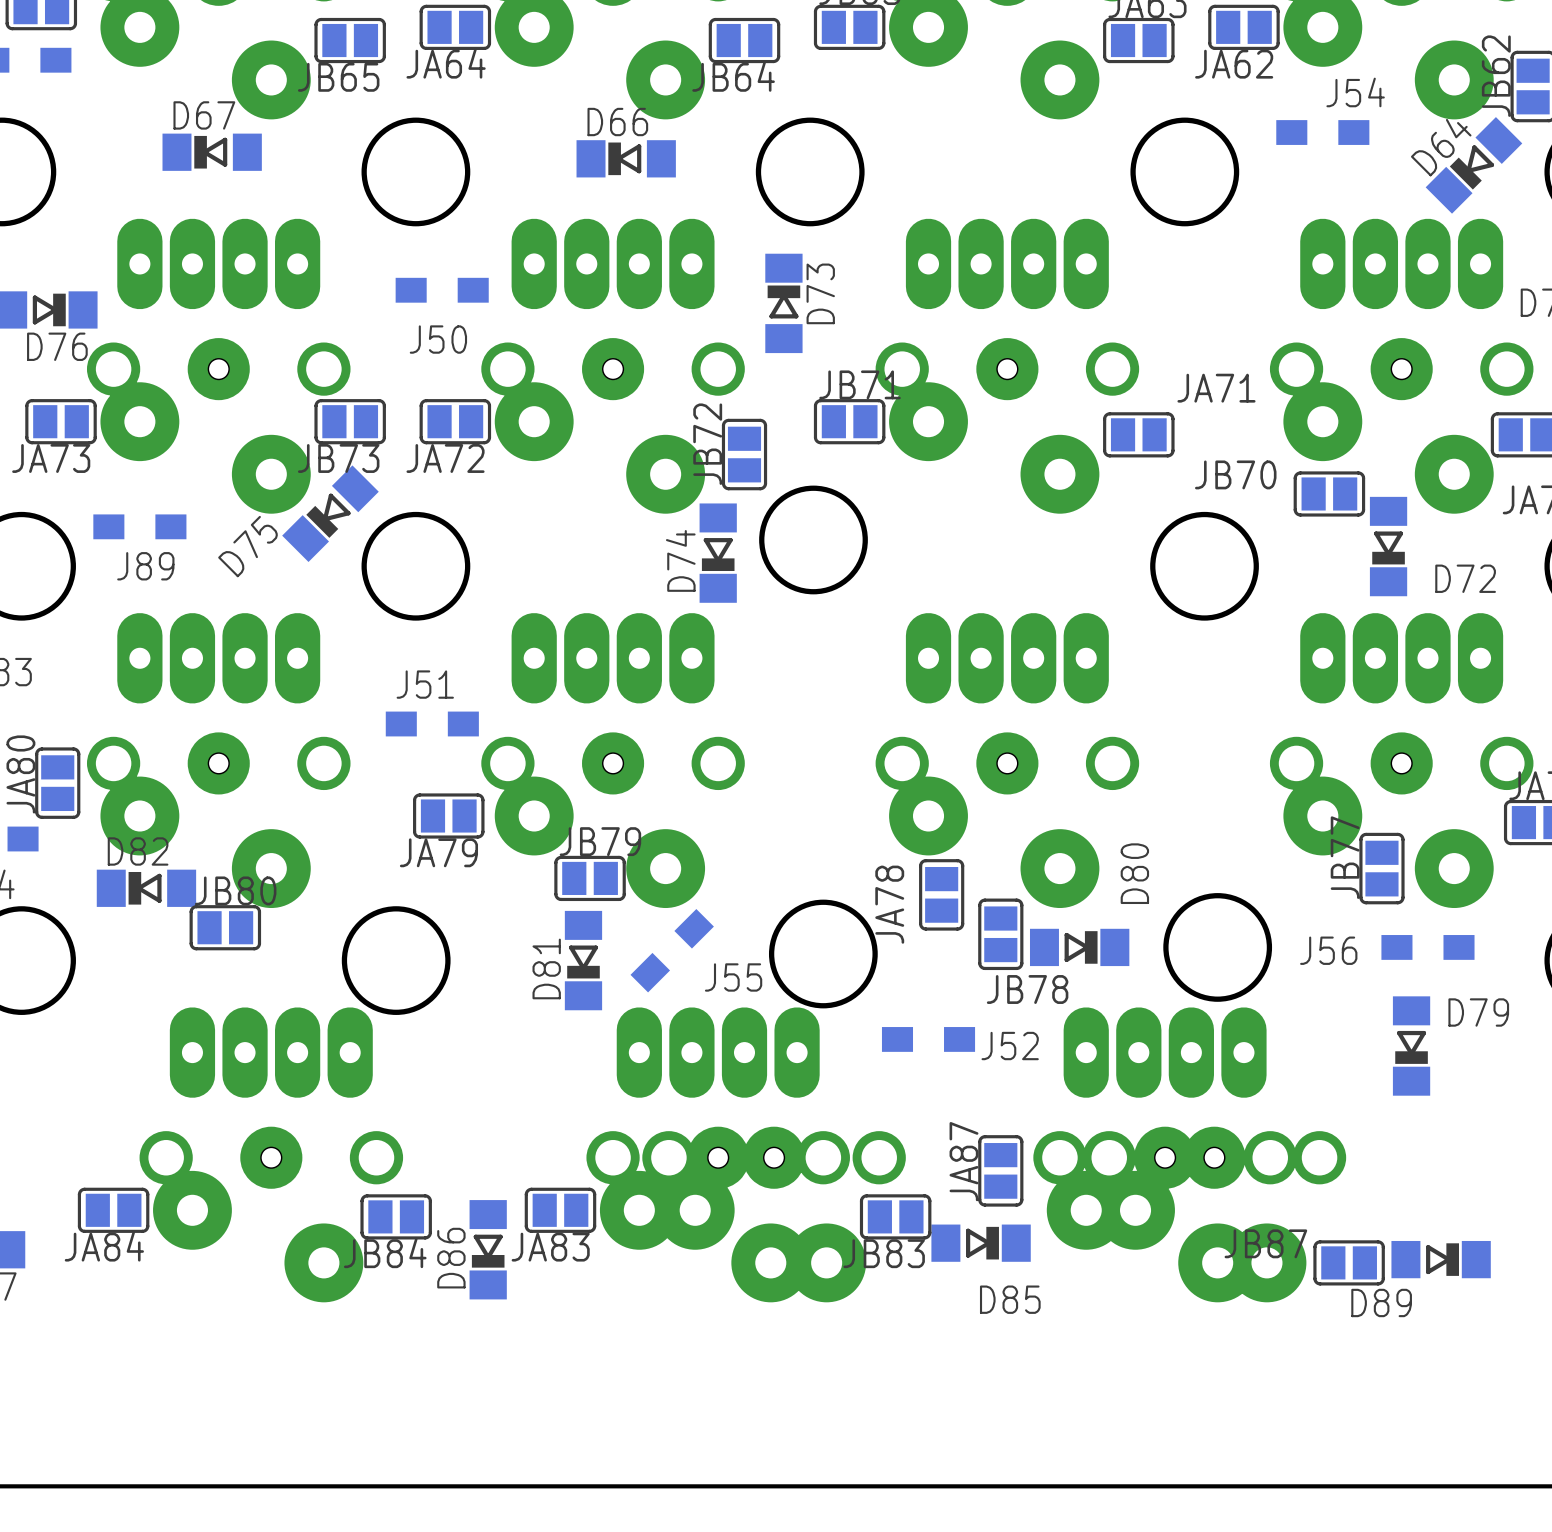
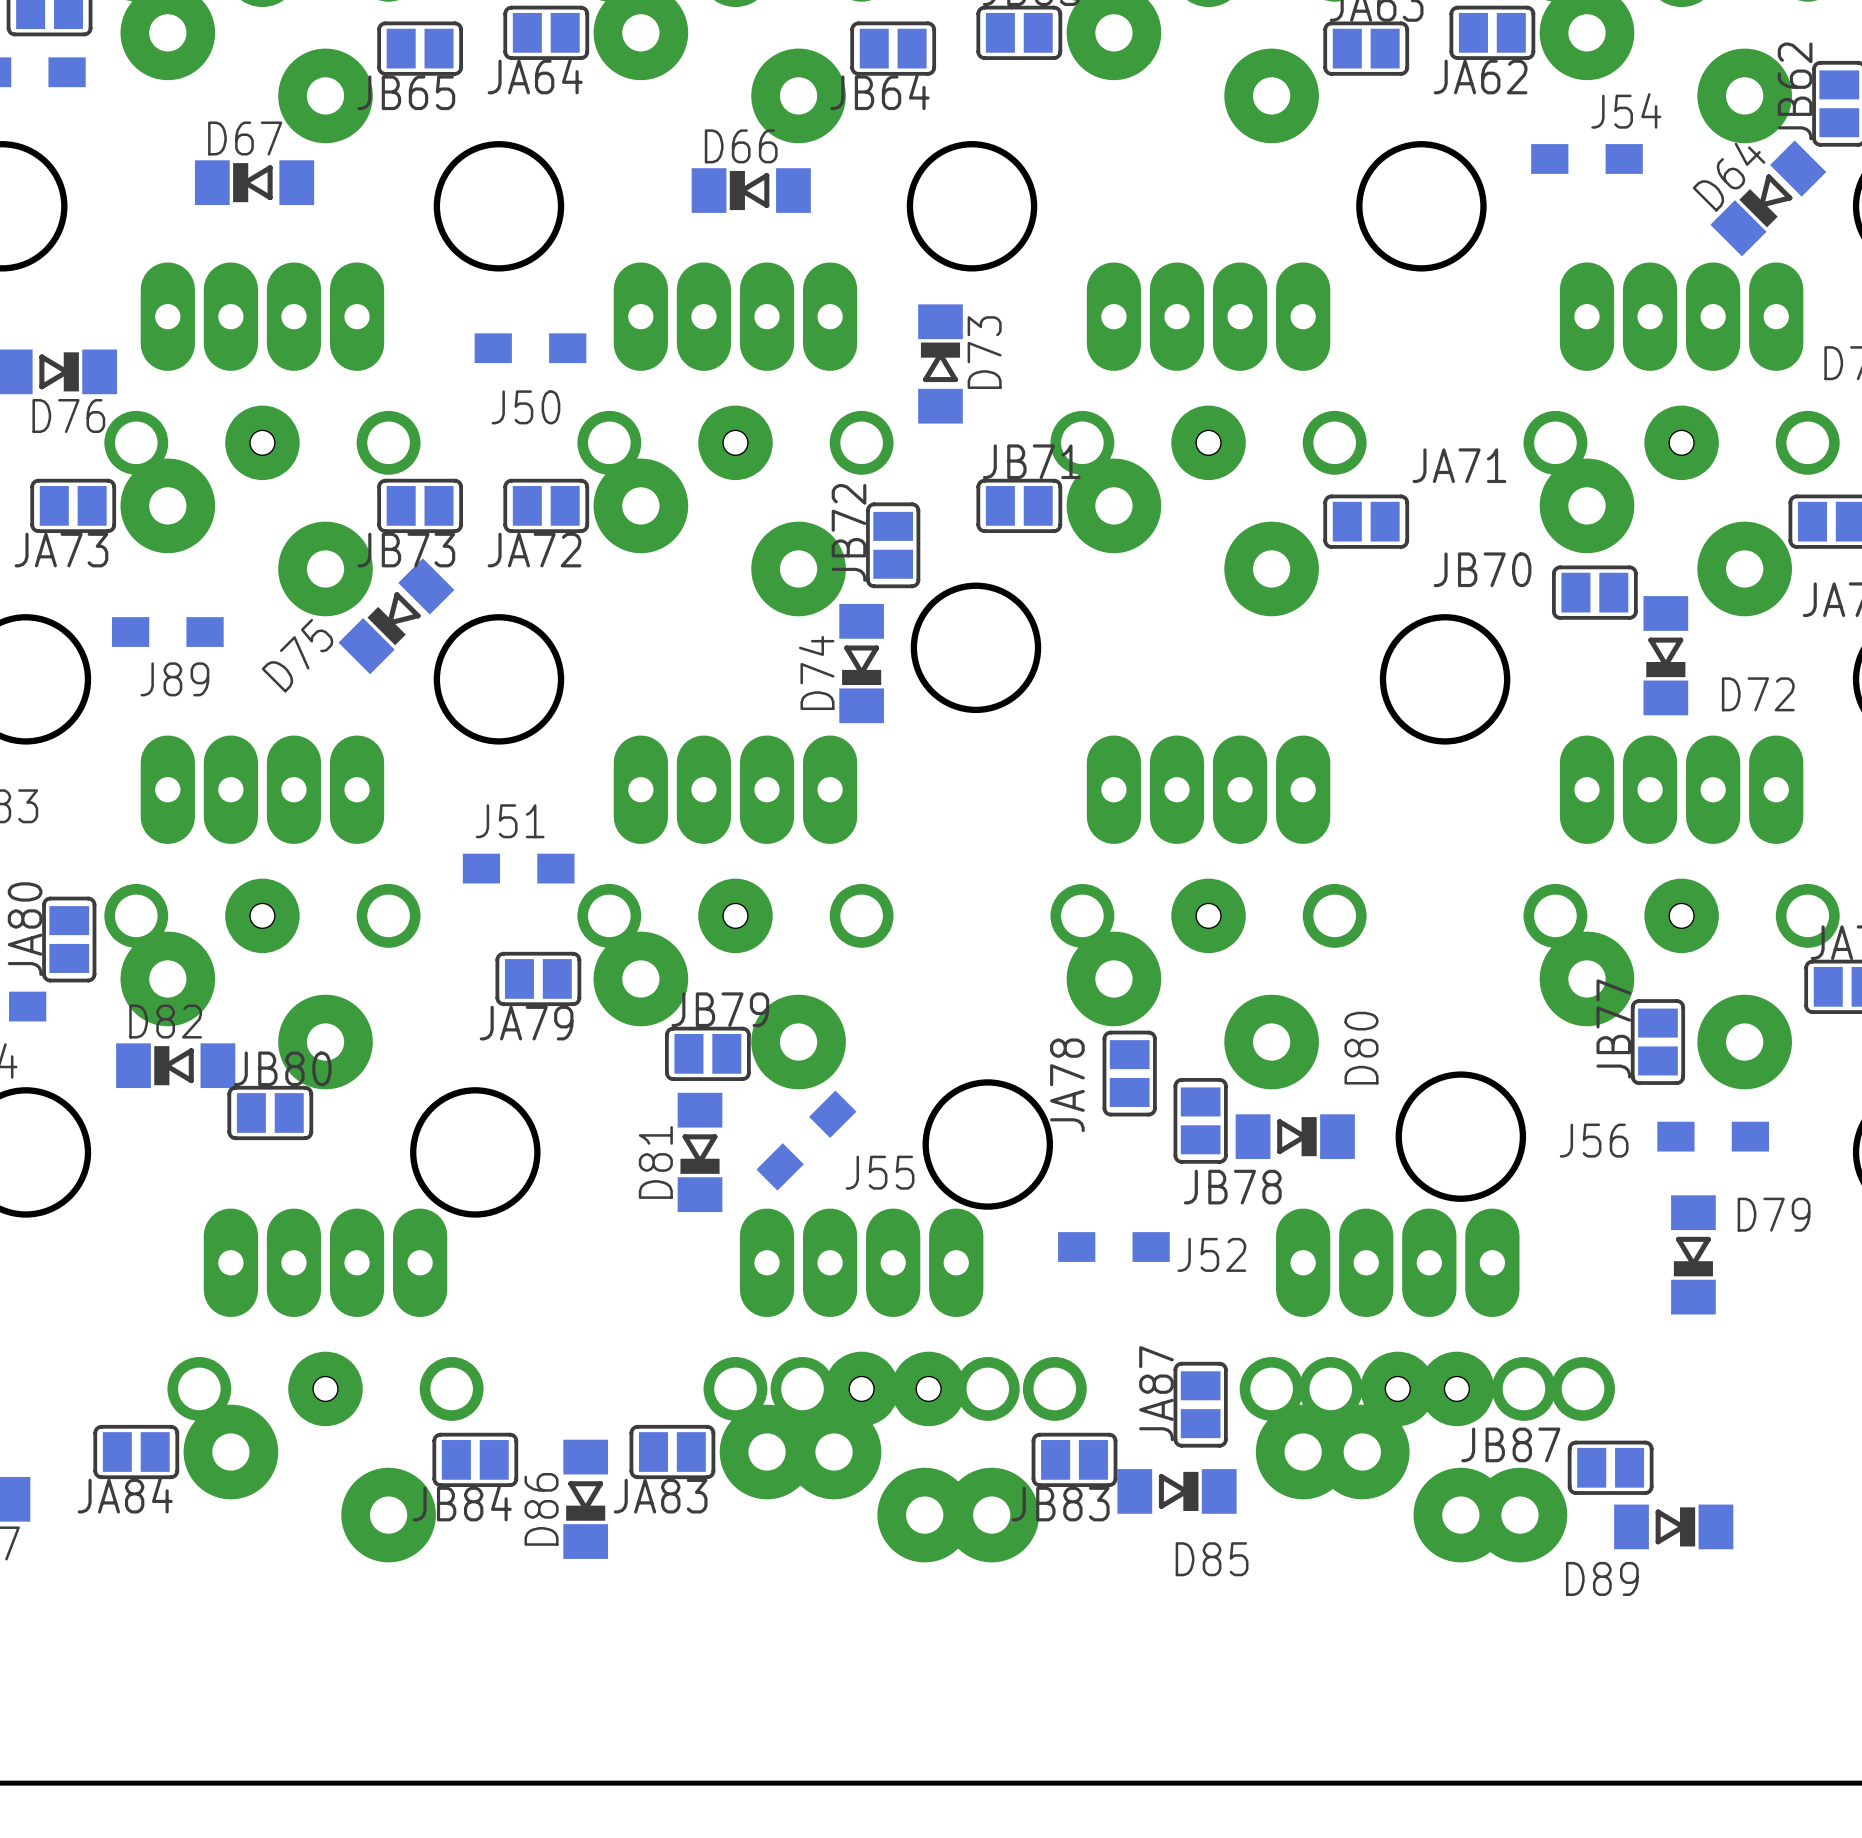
D89 position: (1441, 1259) -> (1673, 1526)
JB87 position: (1349, 1262) -> (1610, 1467)

